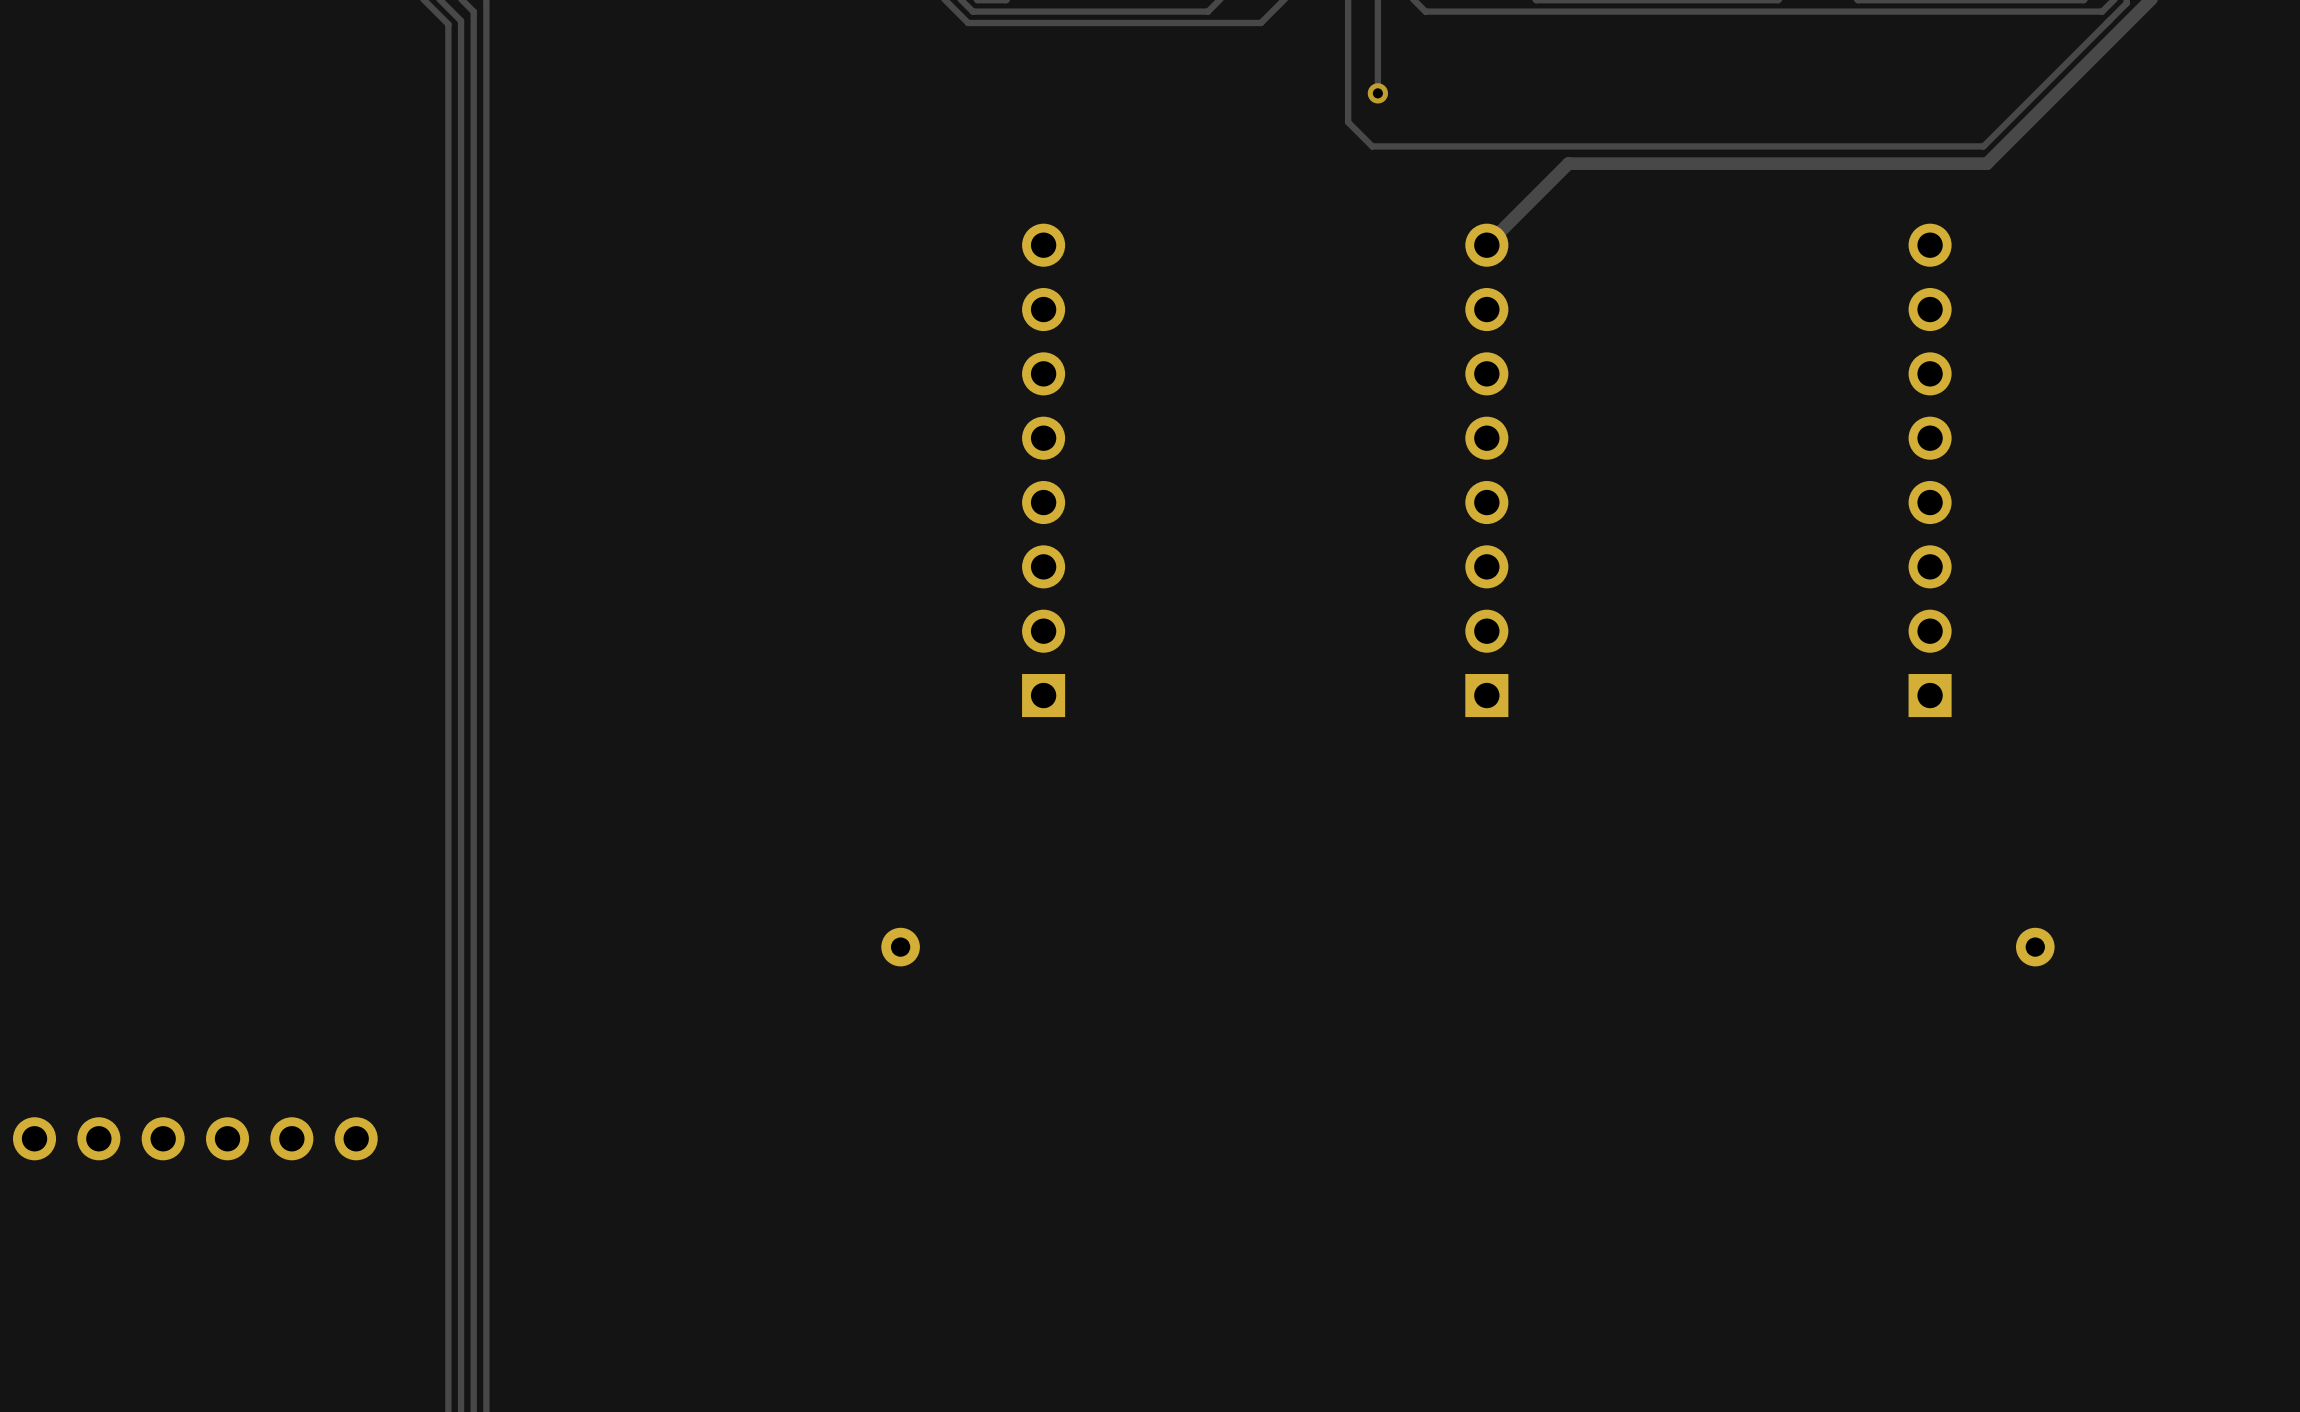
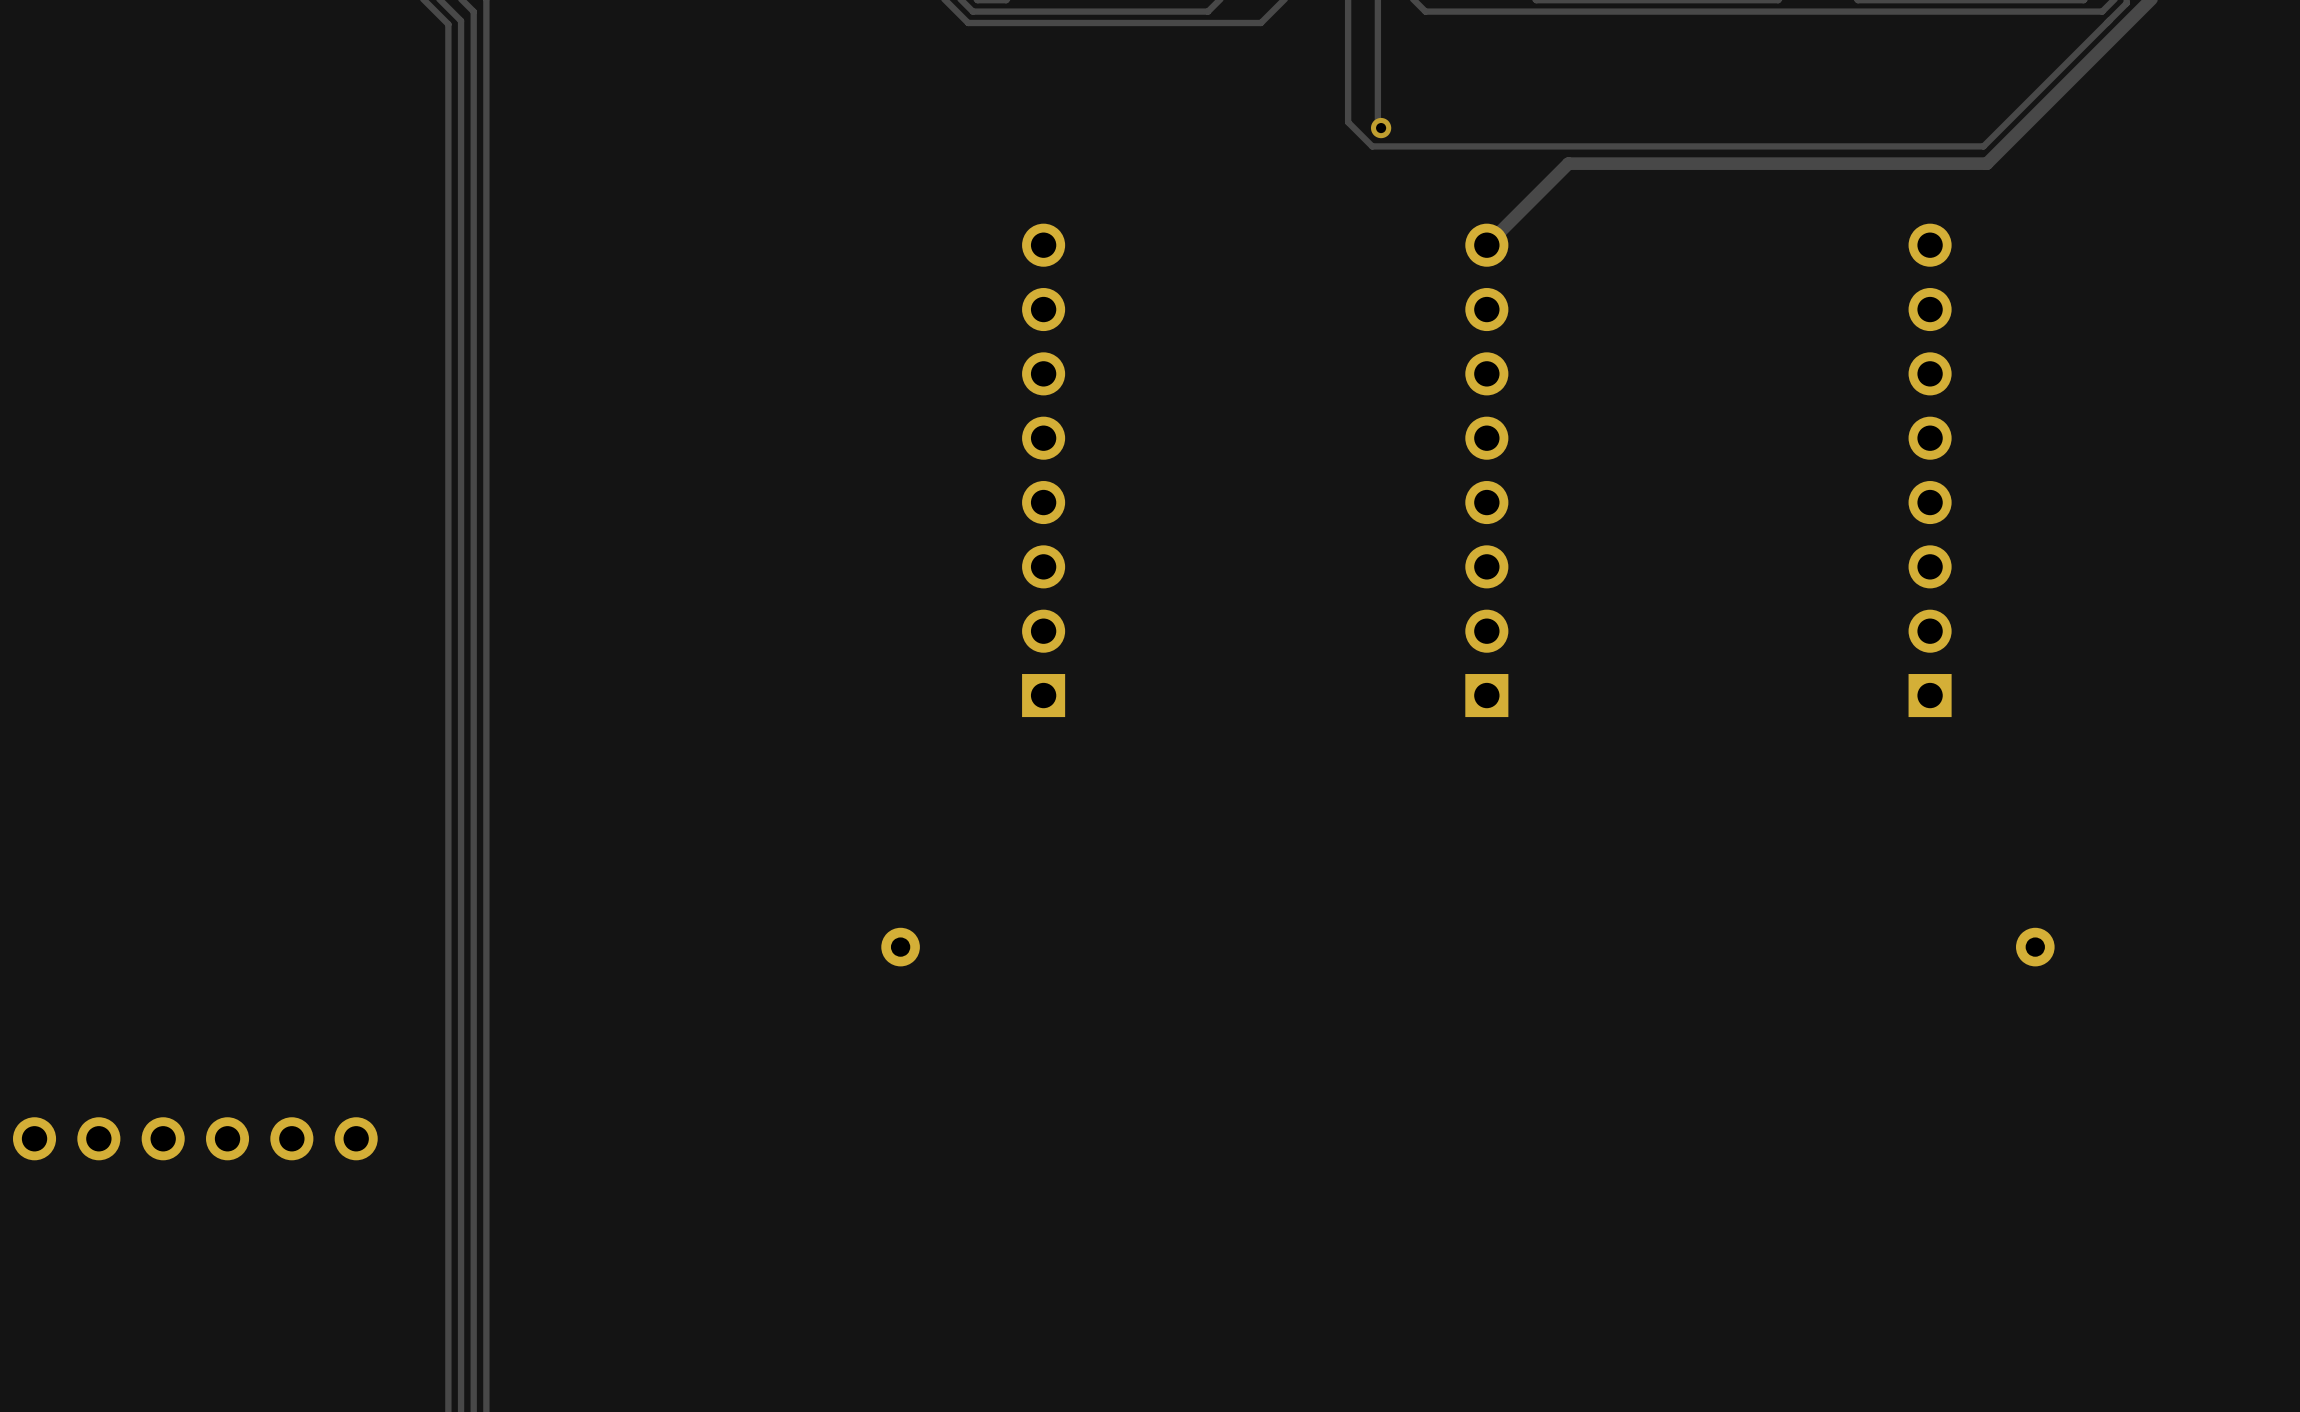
track: none -> (1377, 93) (1377, 124) (1381, 128)
via position: (1377, 93) -> (1381, 128)

